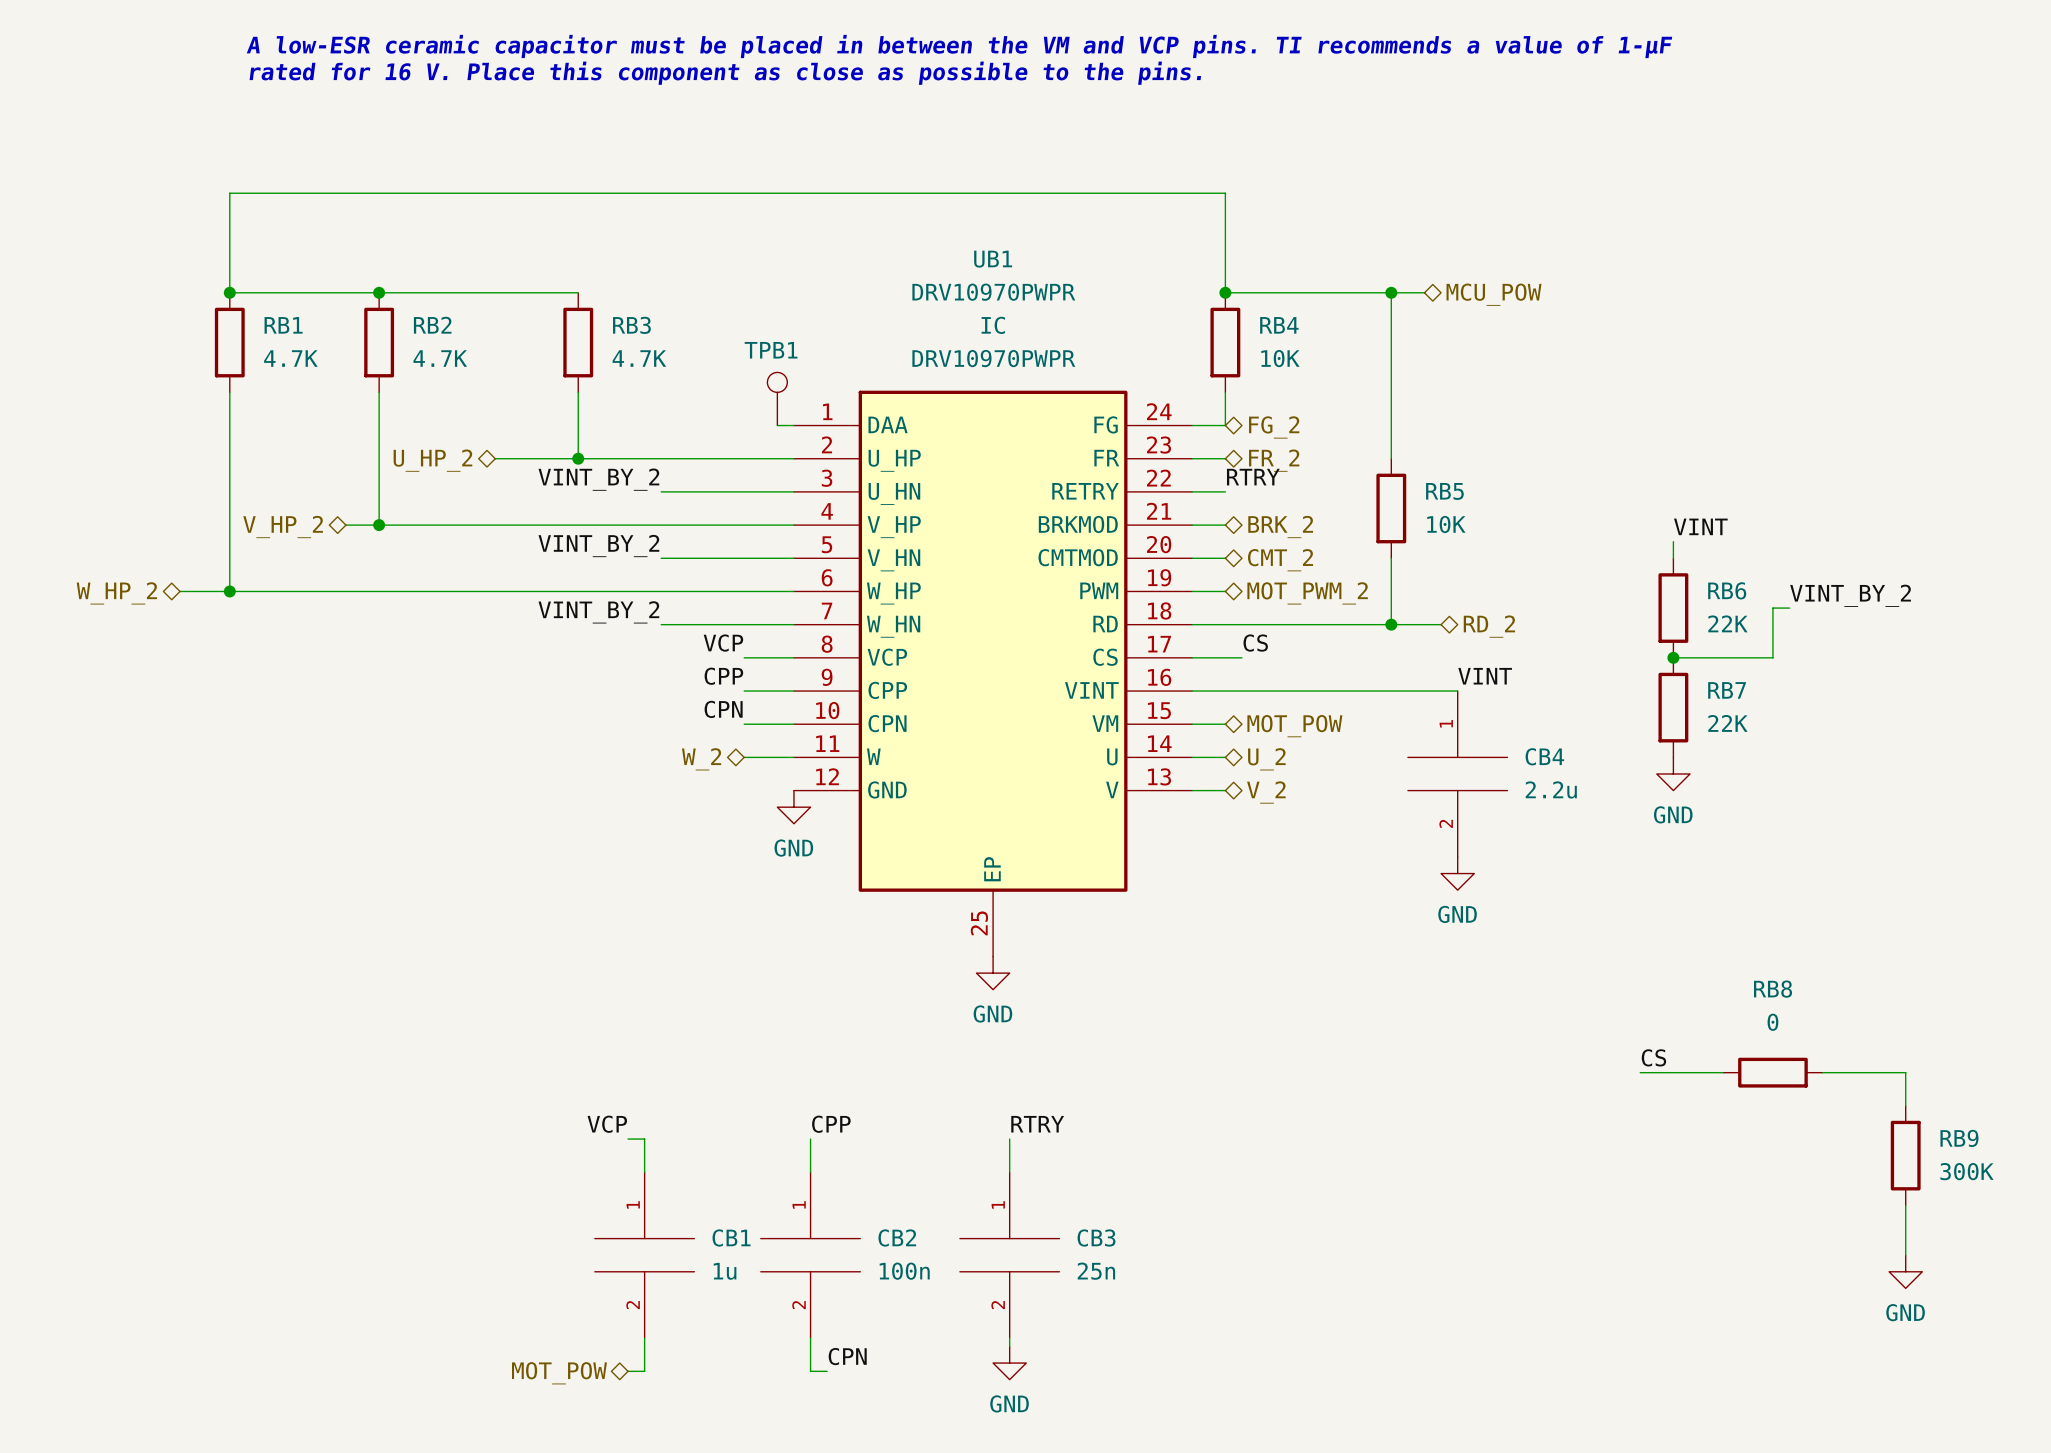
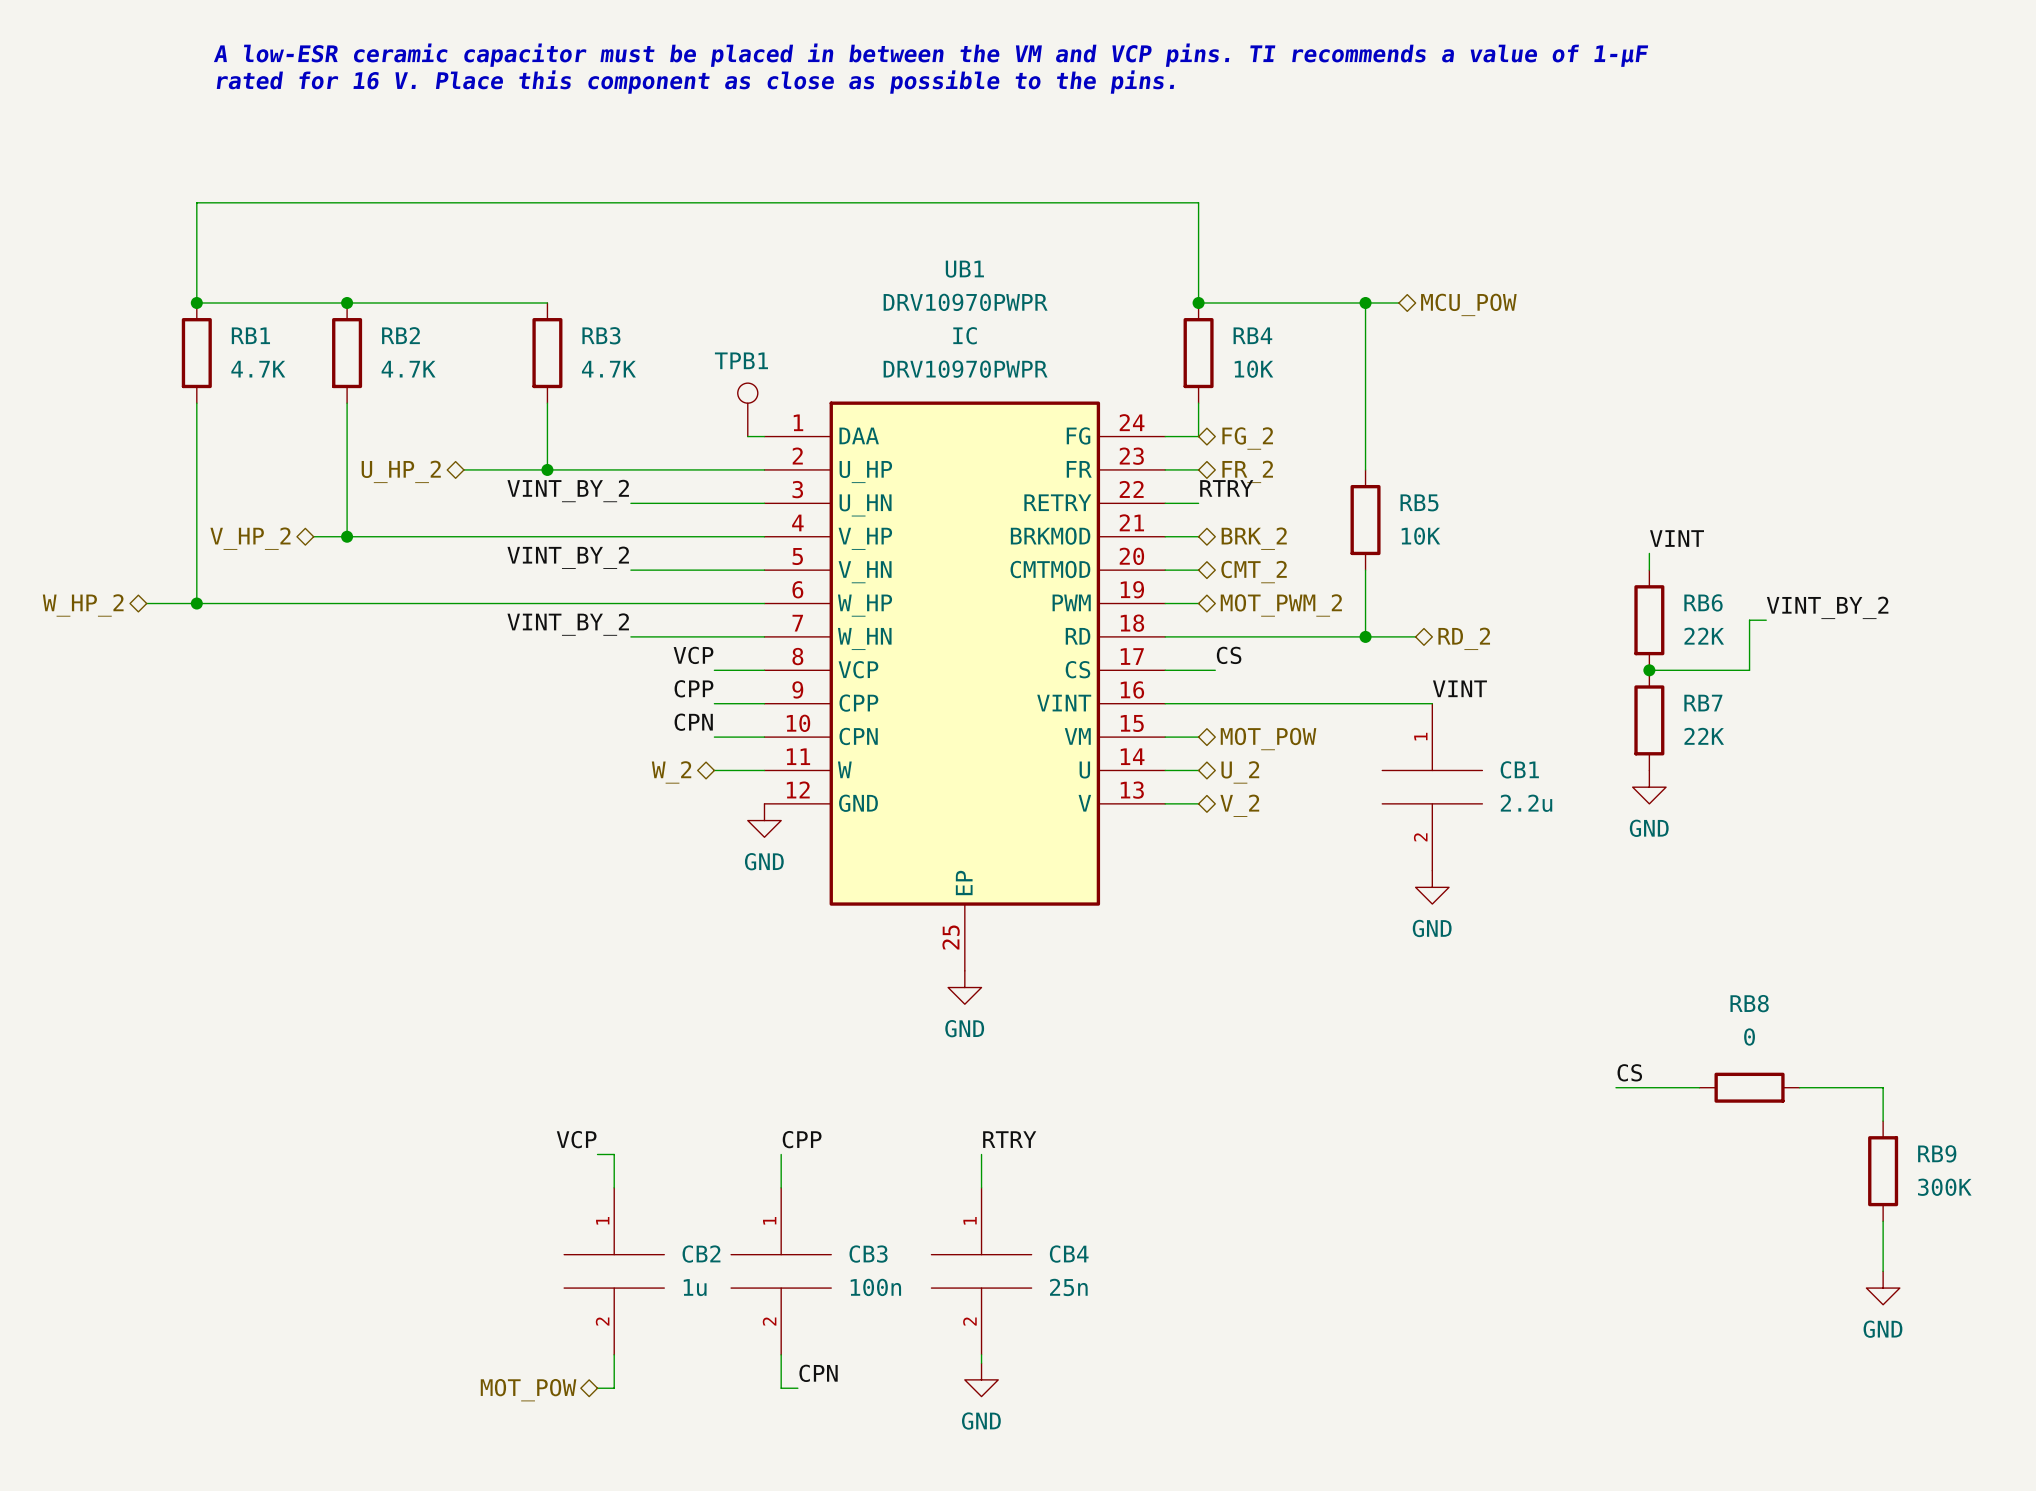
CB4 name: CB4 (1544, 756) -> CB1 (1519, 769)
CB1 name: CB1 (731, 1237) -> CB2 (701, 1254)
CB2 name: CB2 (897, 1237) -> CB3 (868, 1254)
CB3 name: CB3 (1096, 1237) -> CB4 (1069, 1254)

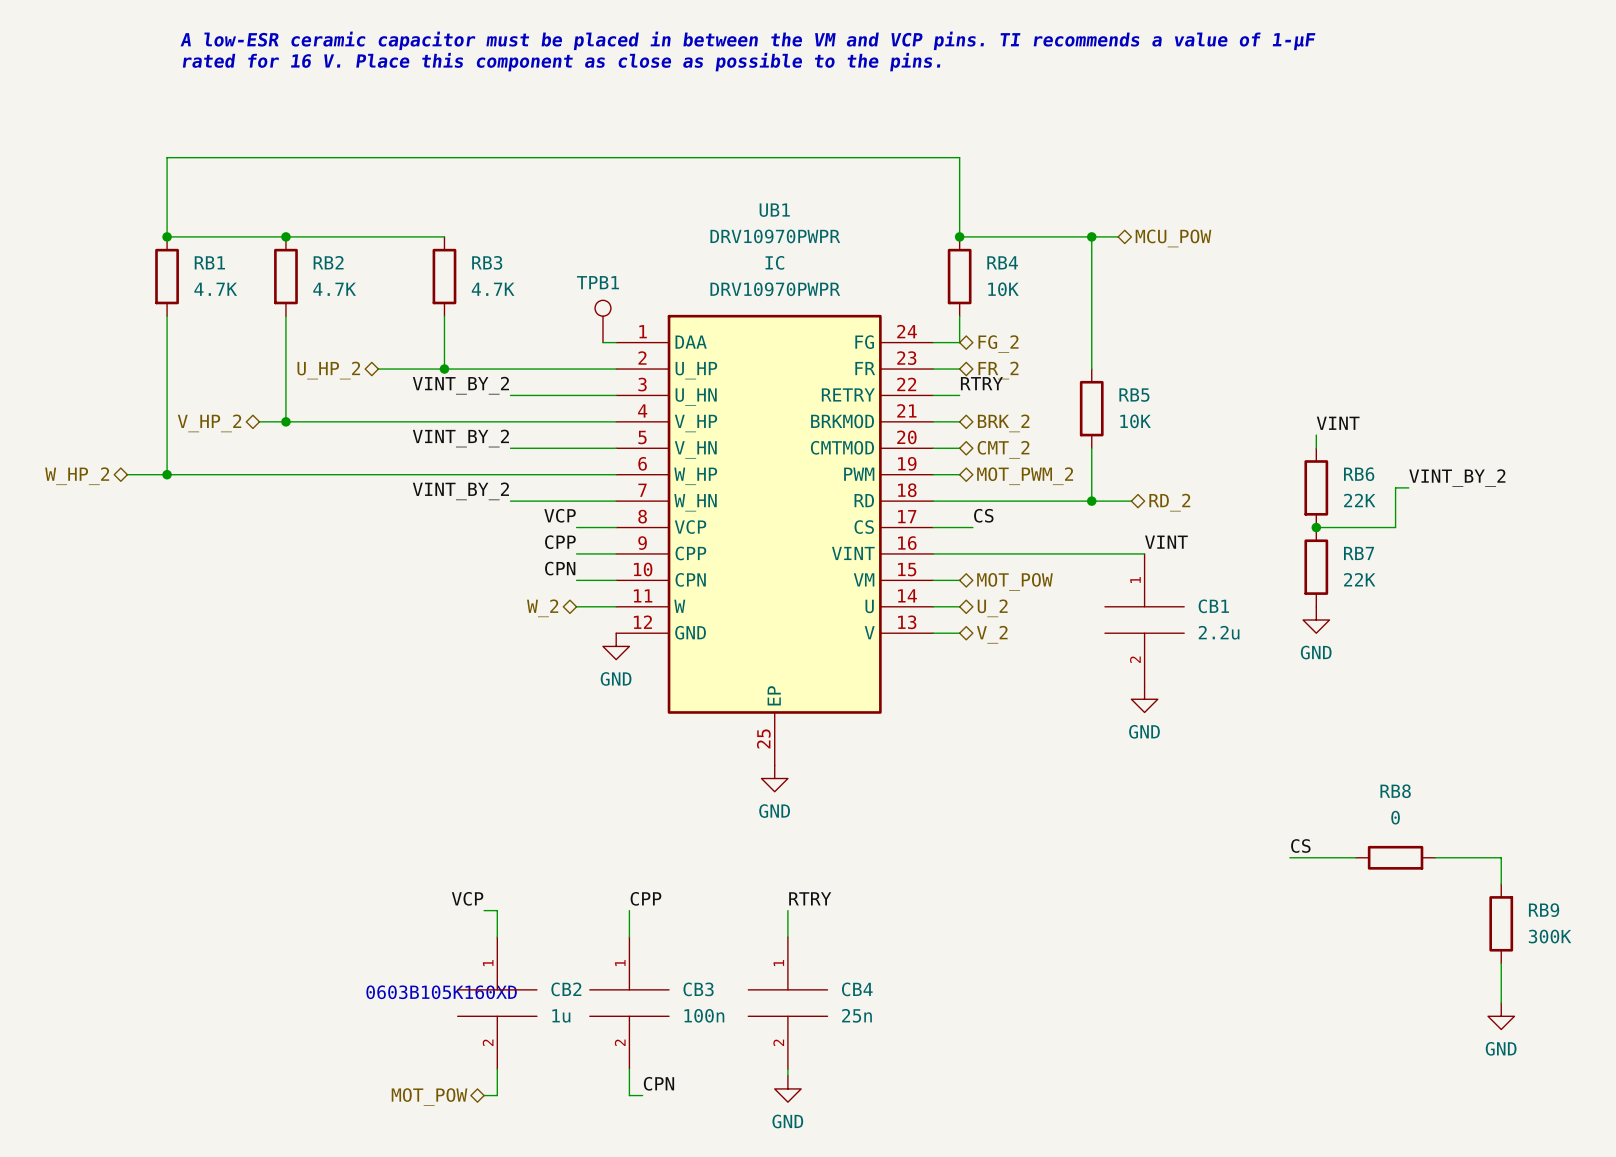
text: none -> 0603B105K160XD (441, 992)

